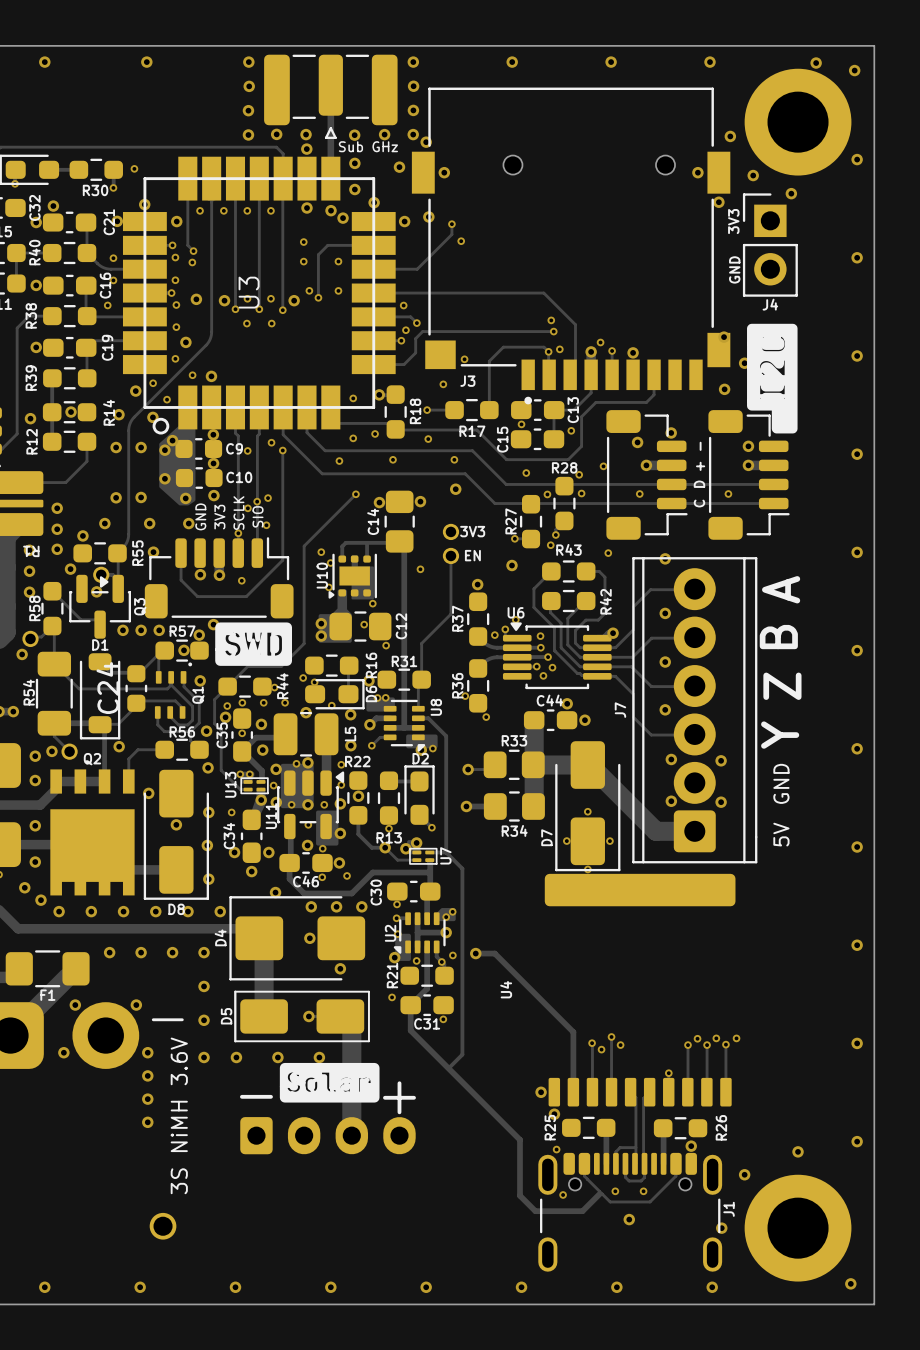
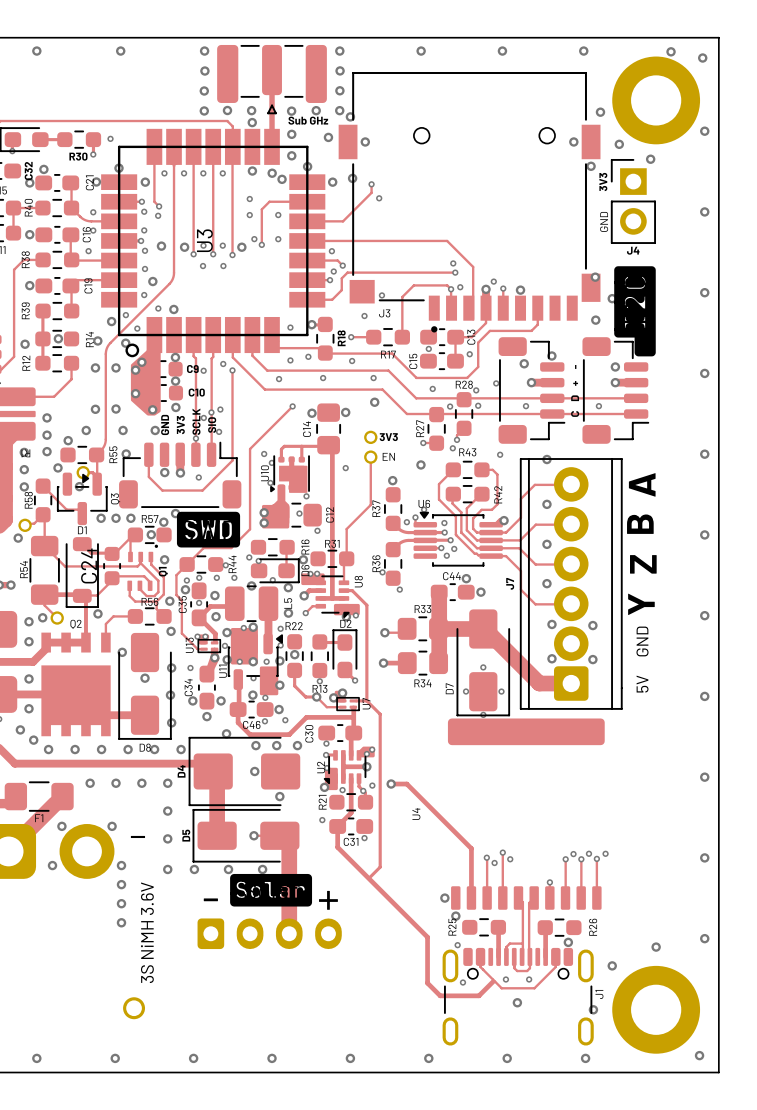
D5 footprint: [234, 990, 370, 1043] -> [192, 808, 300, 863]

